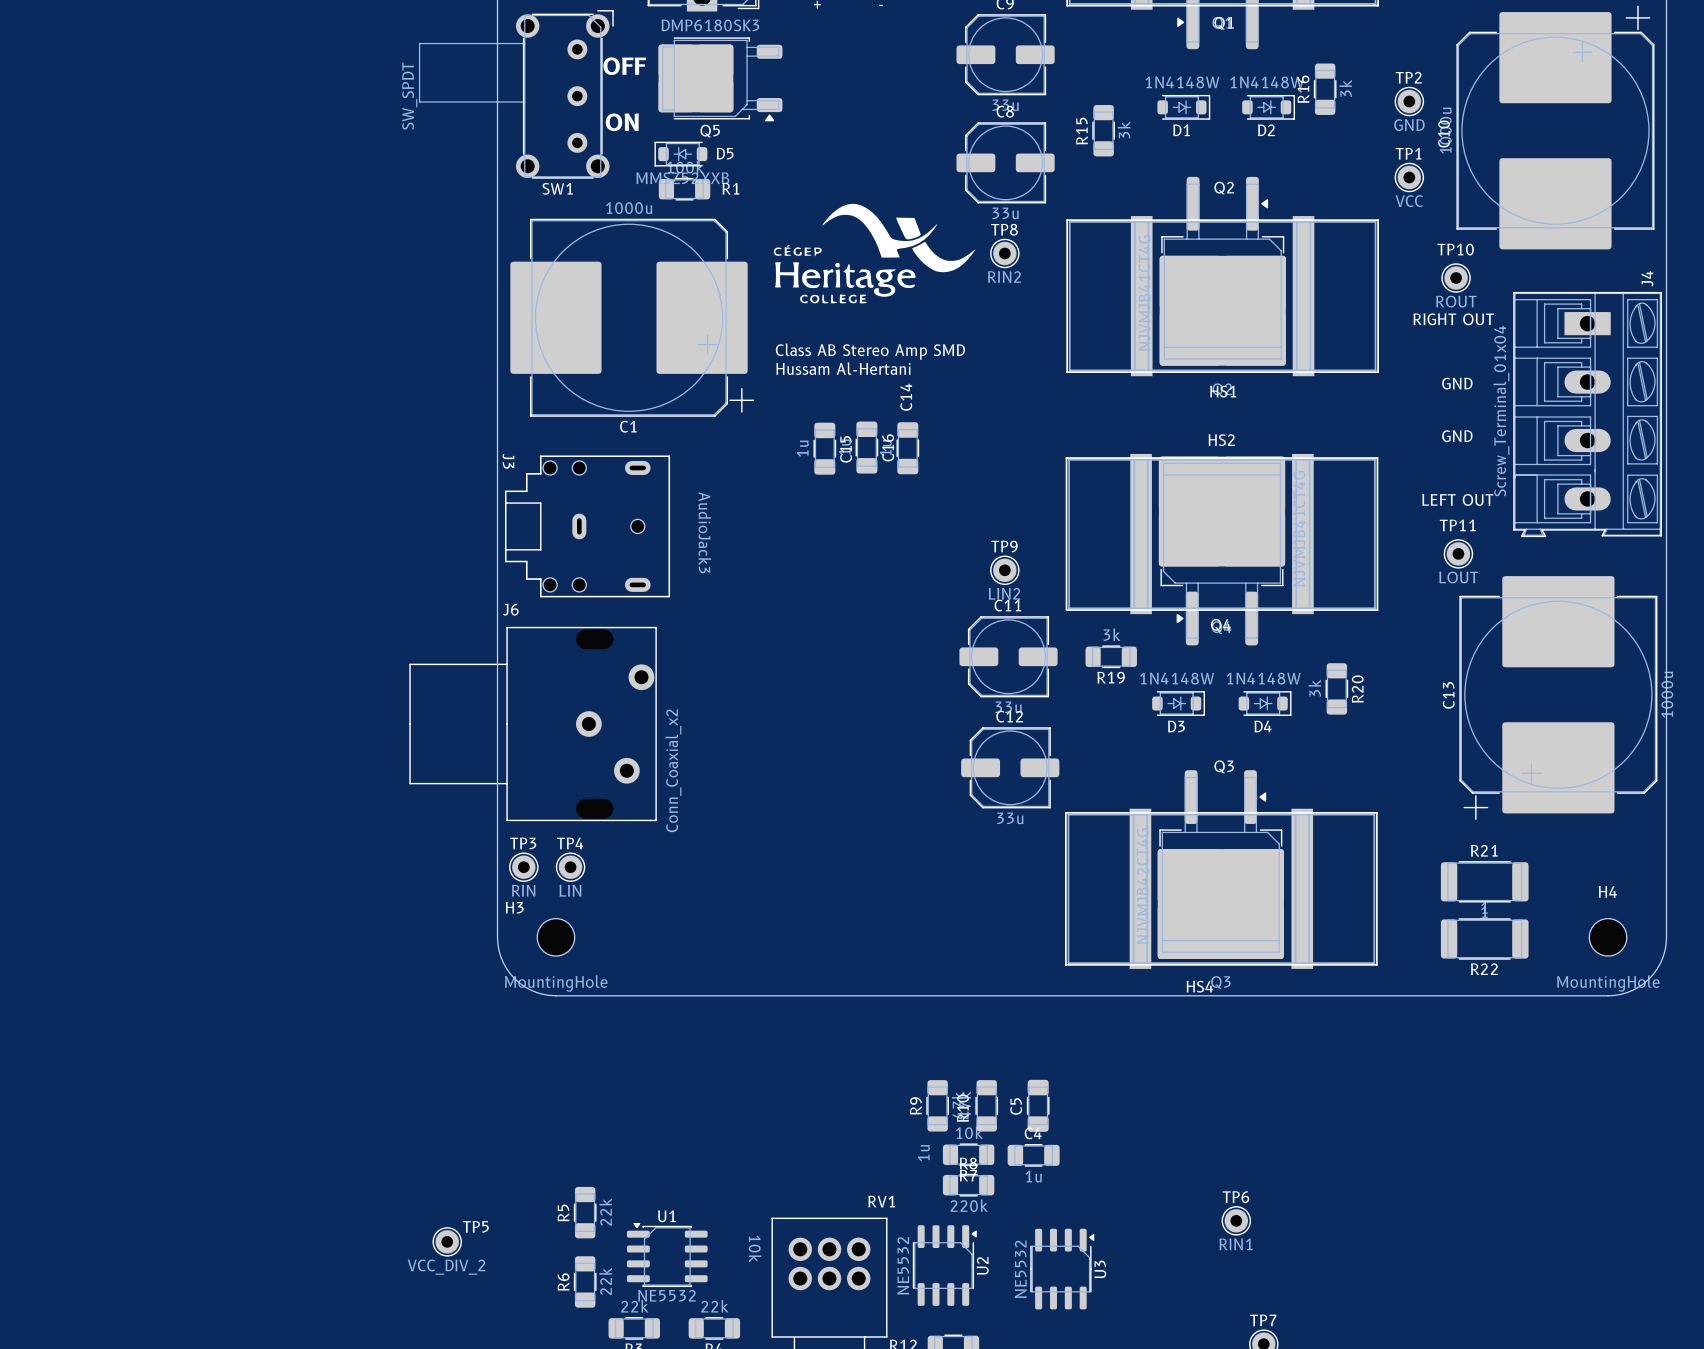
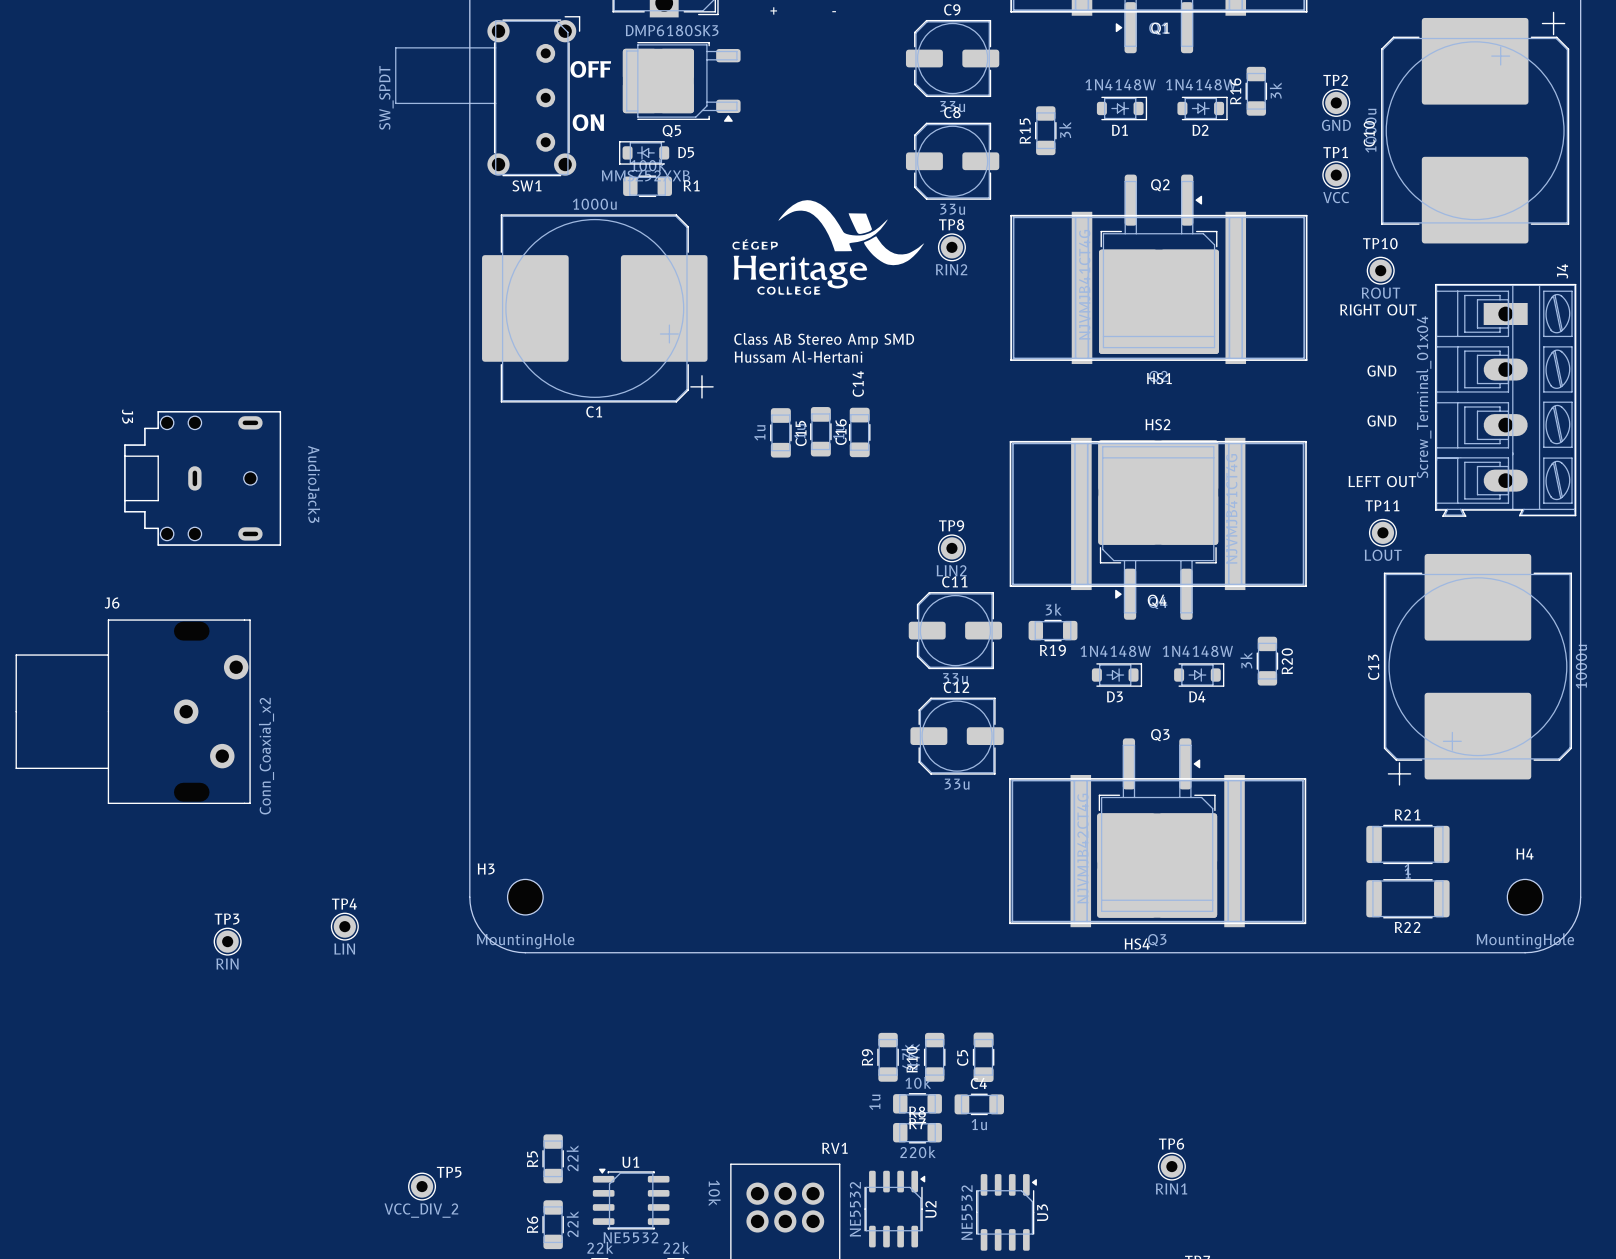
J3 position: (587, 526) -> (202, 478)
J6 position: (533, 724) -> (133, 711)
TP3 position: (523, 867) -> (227, 941)
TP4 position: (570, 867) -> (344, 926)

